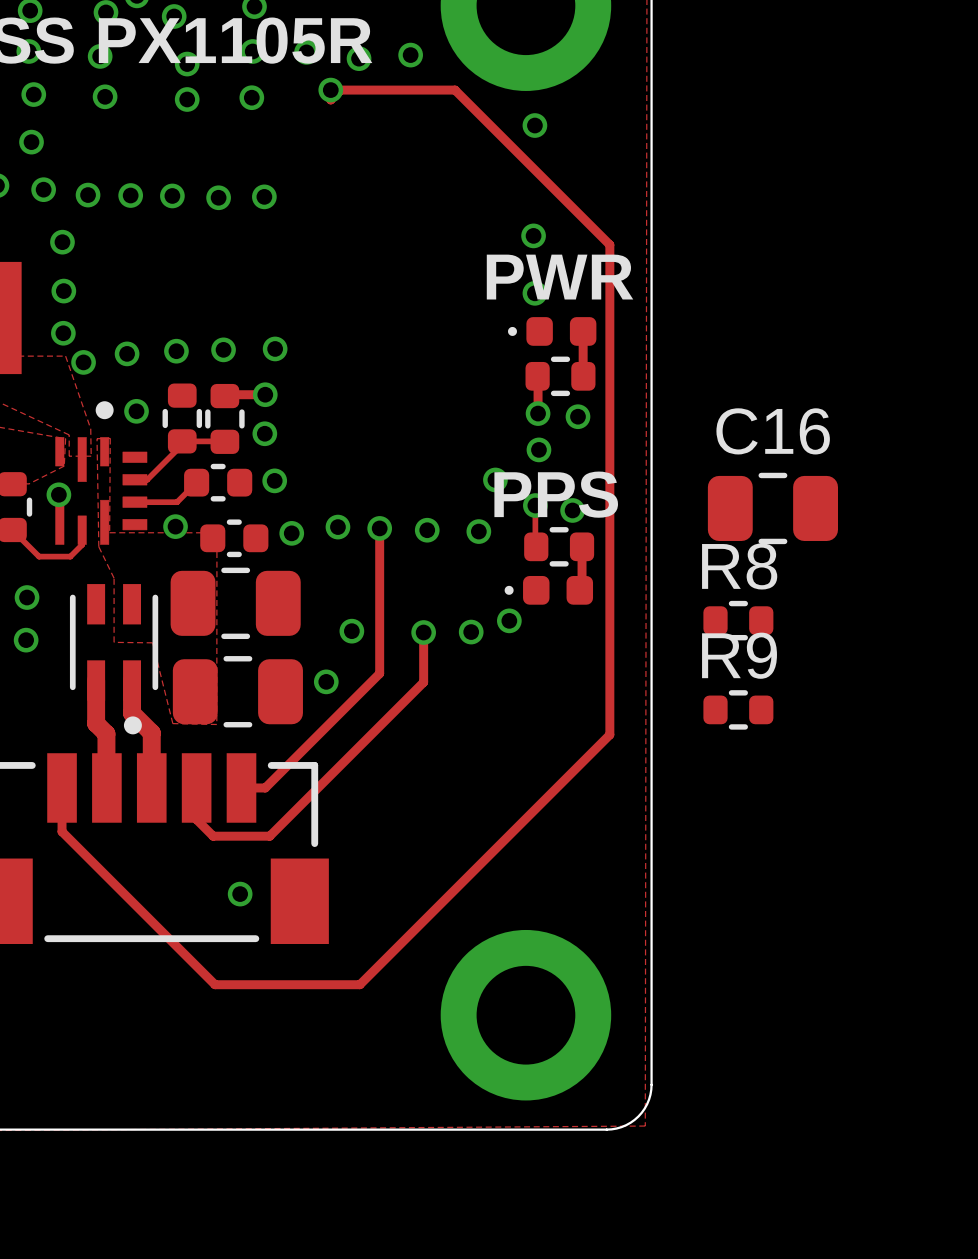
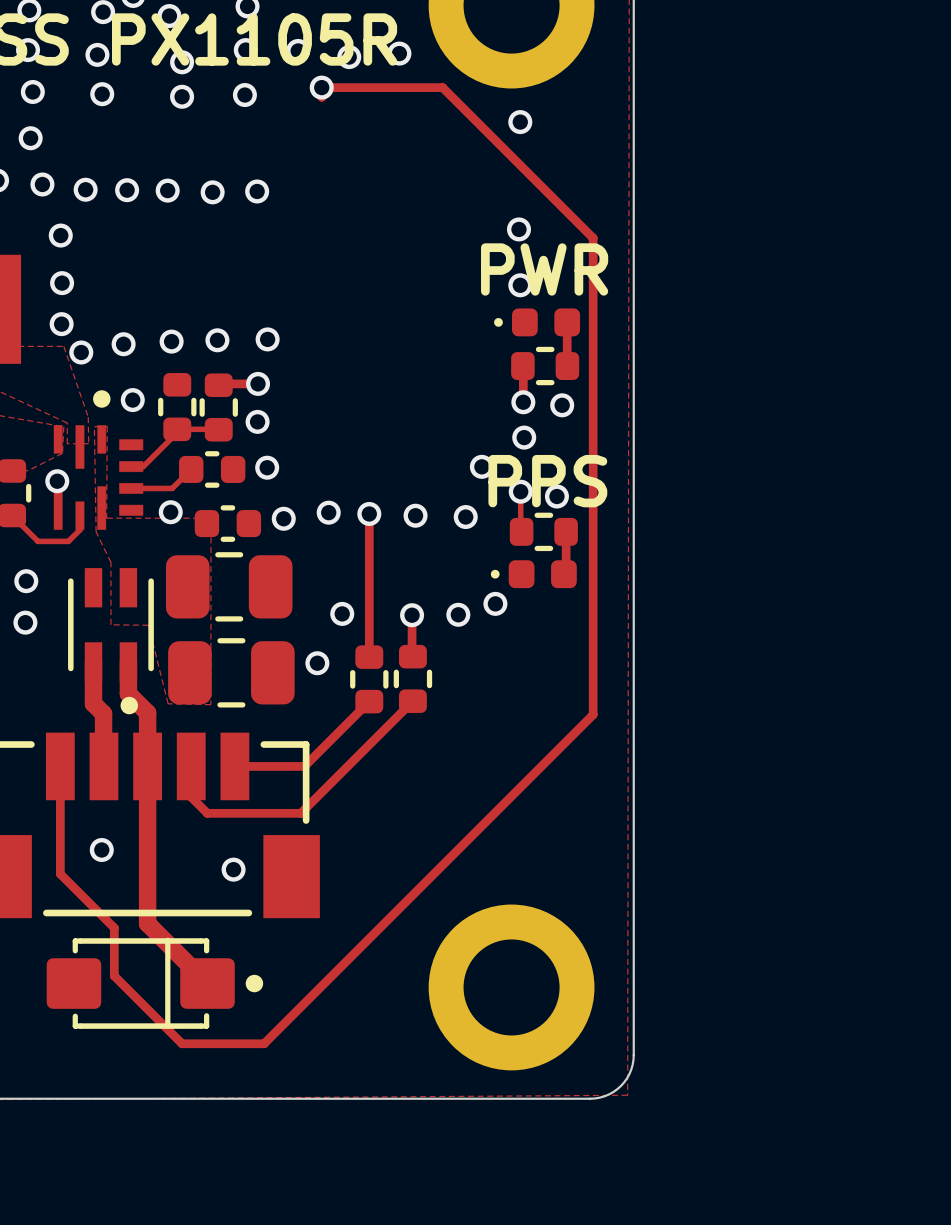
C16: (772, 508) -> none
R8: (738, 620) -> none
track: (379, 673) (265, 787) -> (369, 701) (304, 766) (258, 766)
track: (423, 674) (423, 682) (269, 836) -> (412, 701) (300, 813) (262, 813)
part: none -> (369, 679)
part: none -> (412, 678)
R9: (738, 709) -> none
track: none -> (147, 766) (147, 923) (207, 983)
track: (62, 831) (215, 984) (359, 984) -> (60, 808) (60, 874) (114, 928) (114, 976) (182, 1043) (264, 1043) (350, 957)
via: none -> (101, 850)
part: none -> (154, 983)

